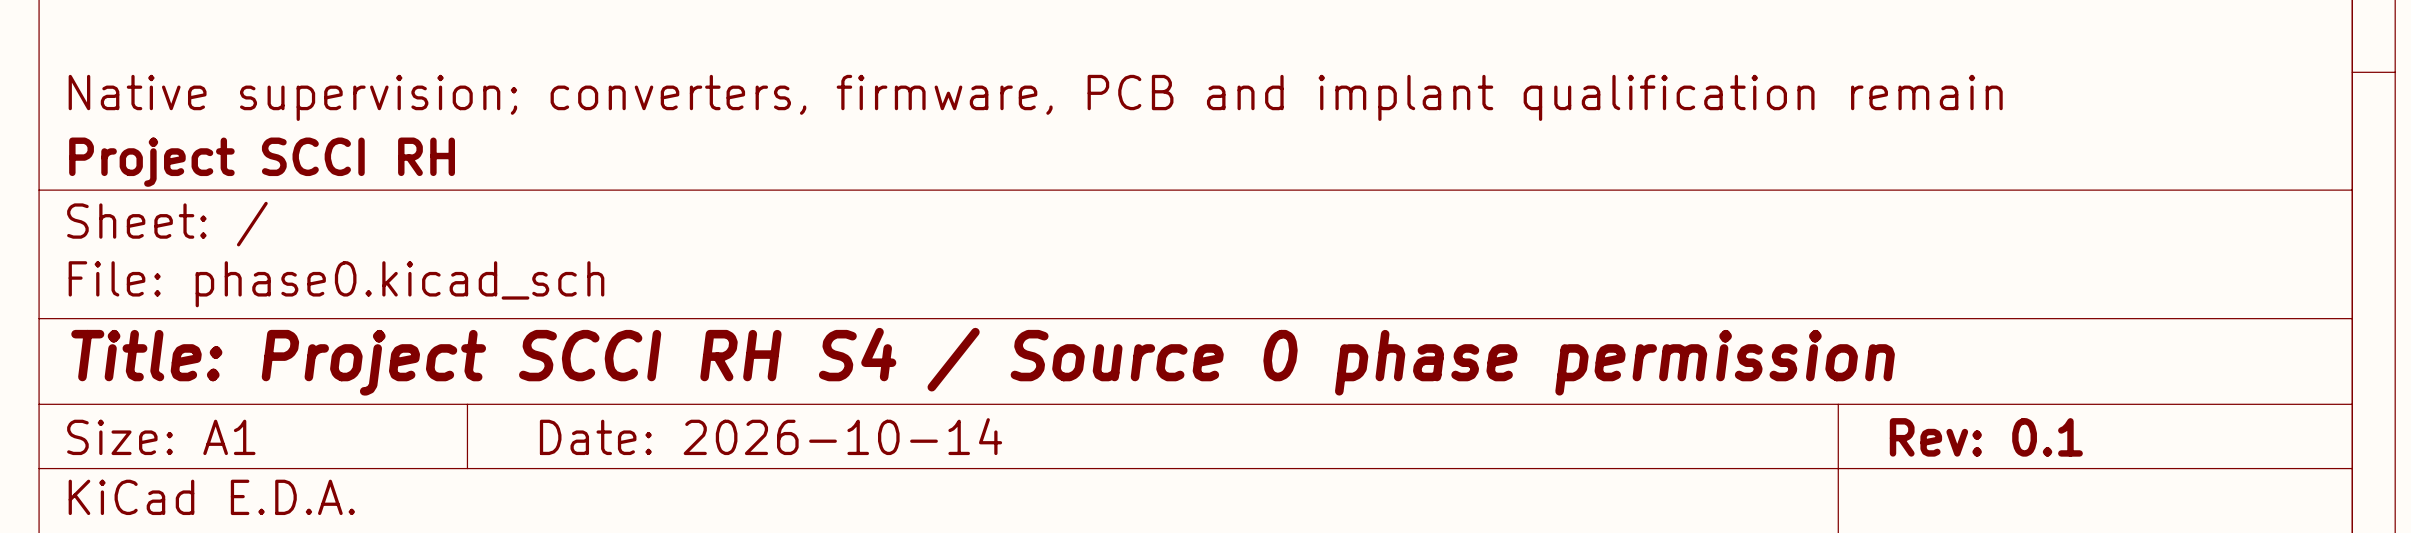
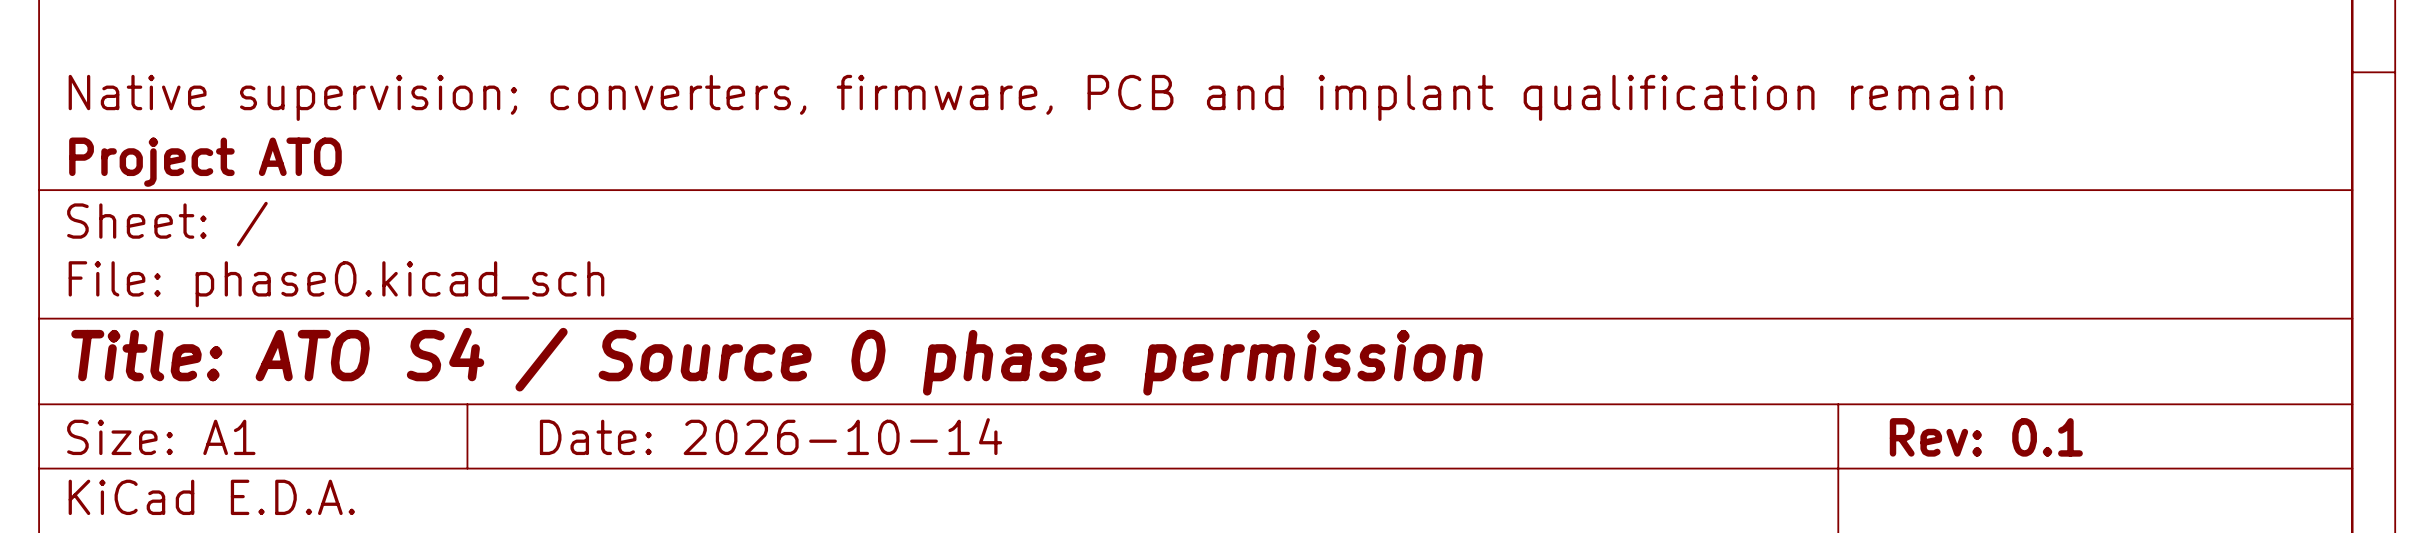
title block: Project SCCI RH (262, 162) -> Project ATO (205, 162)
title block: Title: Project SCCI RH S4 / Source 0 phase permission (983, 361) -> Title: ATO S4 / Source 0 phase permission (777, 361)

